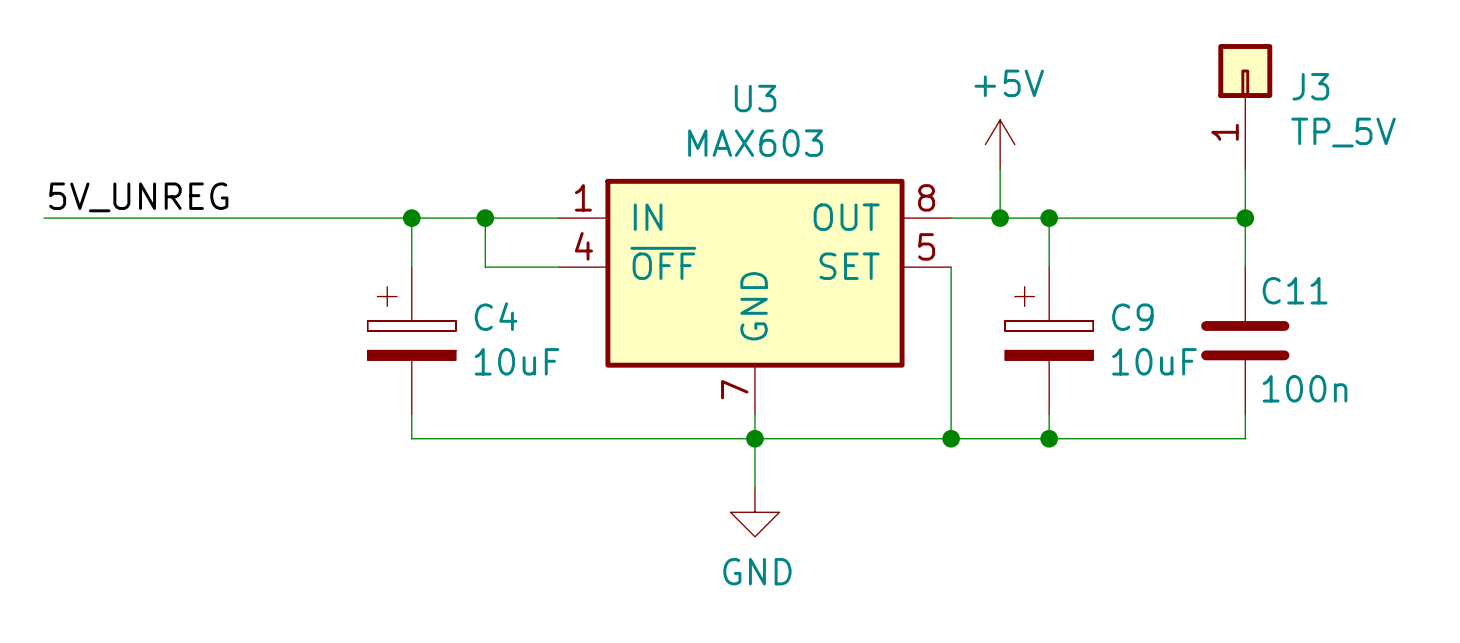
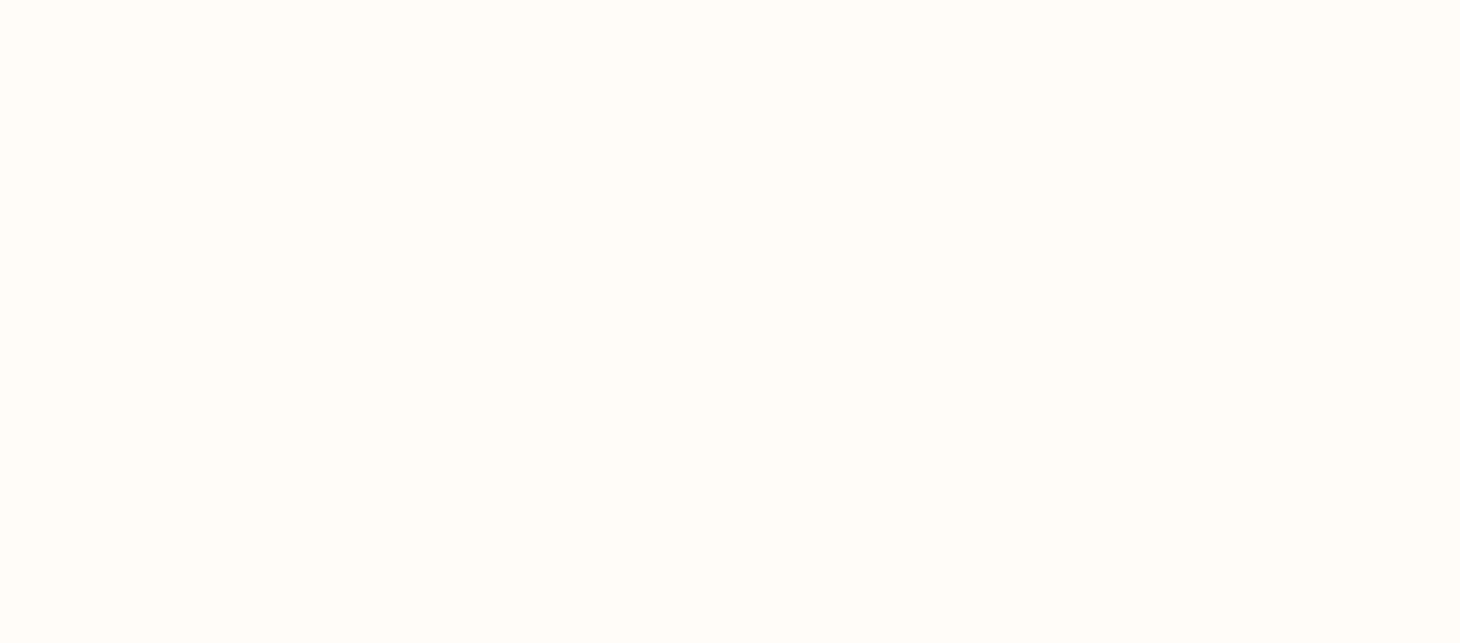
J3: TP_5V (1245, 106) -> none
power symbol: +5V (1000, 144) -> none
wire: (1000, 169) (1000, 218) -> none
wire: (1245, 169) (1245, 267) -> none
label: 5V_UNREG (138, 197) -> none
wire: (44, 218) (558, 218) -> none
wire: (411, 218) (411, 267) -> none
junction: (411, 218) -> none
wire: (485, 218) (485, 267) (558, 267) -> none
junction: (485, 218) -> none
wire: (951, 218) (1245, 218) -> none
junction: (1000, 218) -> none
wire: (1049, 218) (1049, 267) -> none
junction: (1049, 218) -> none
junction: (1245, 218) -> none
wire: (951, 267) (951, 438) -> none
U3: MAX603 (754, 296) -> none
C4: 10uF (411, 340) -> none
C9: 10uF (1049, 340) -> none
C11: 100n (1245, 340) -> none
wire: (411, 414) (411, 438) (1245, 438) (1245, 414) -> none
wire: (754, 414) (754, 487) -> none
wire: (1049, 414) (1049, 438) -> none
junction: (754, 438) -> none
junction: (951, 438) -> none
junction: (1049, 438) -> none
power symbol: GND (754, 512) -> none

